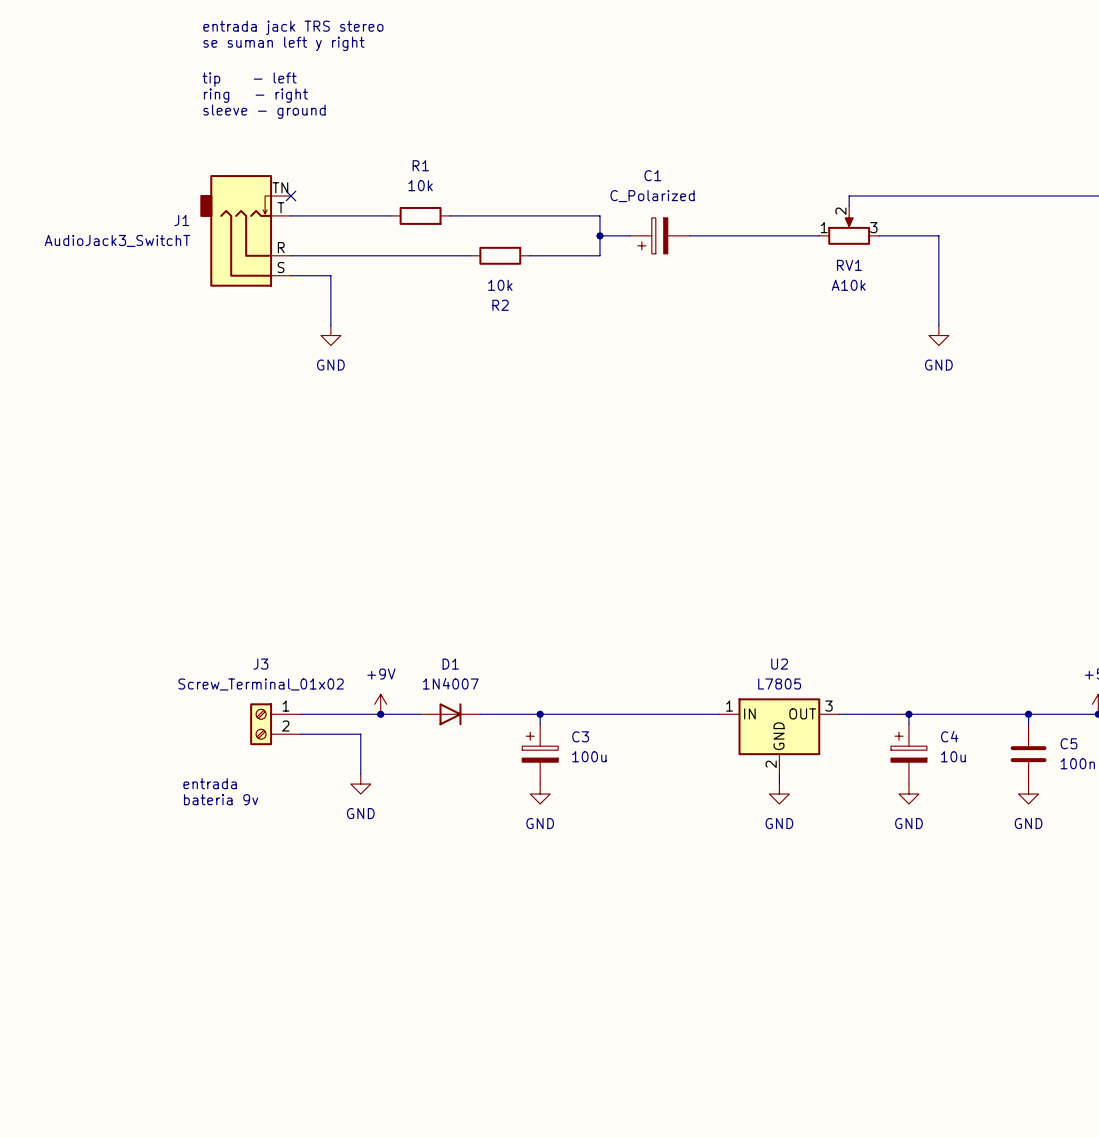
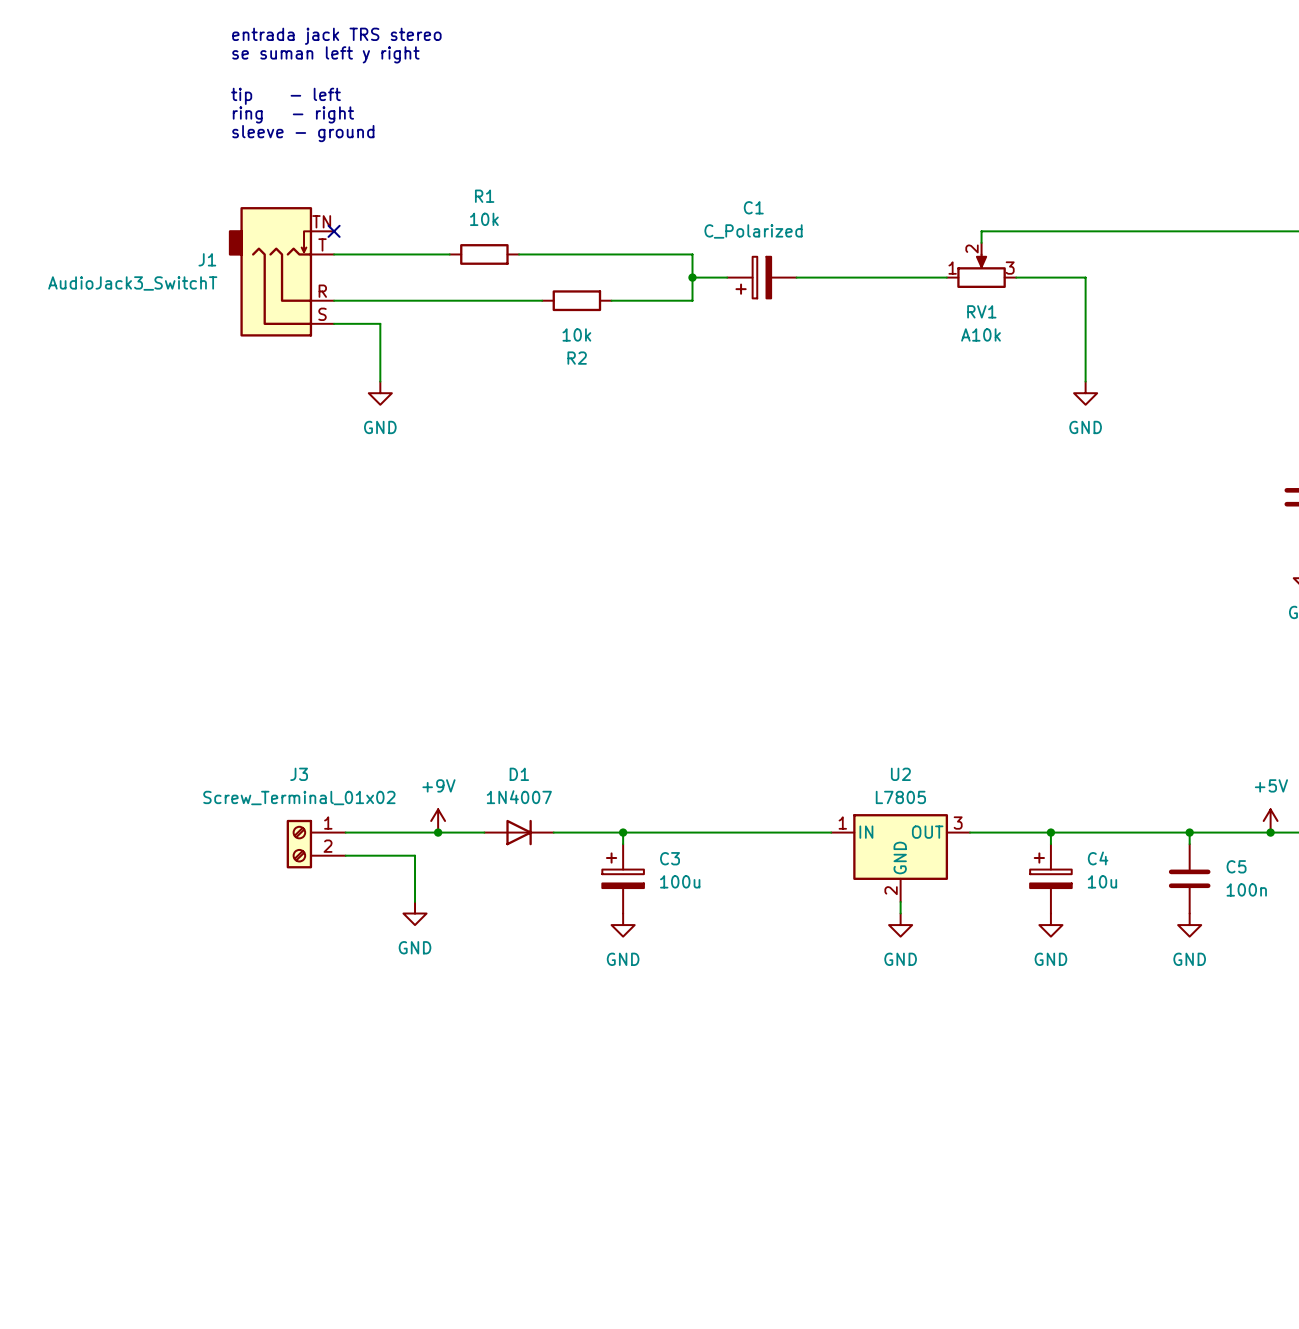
text: entrada (210, 783) -> none
text: bateria 9v (221, 799) -> none

